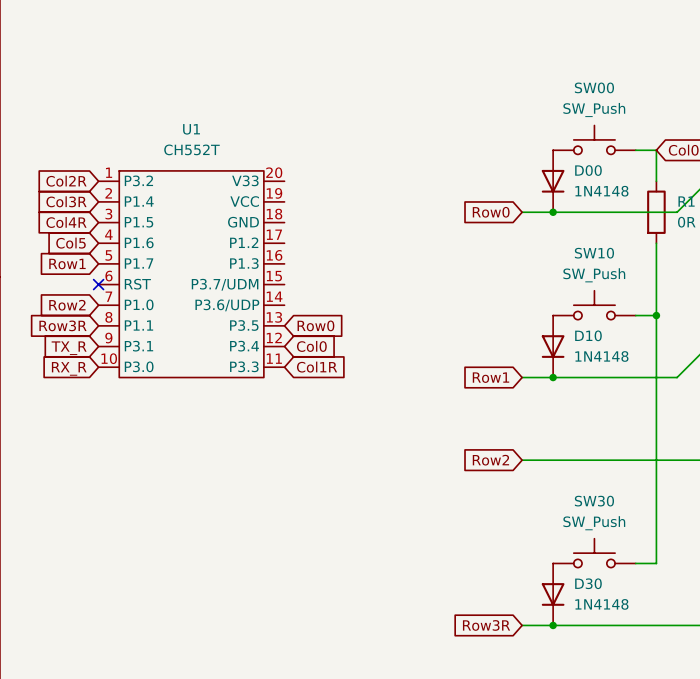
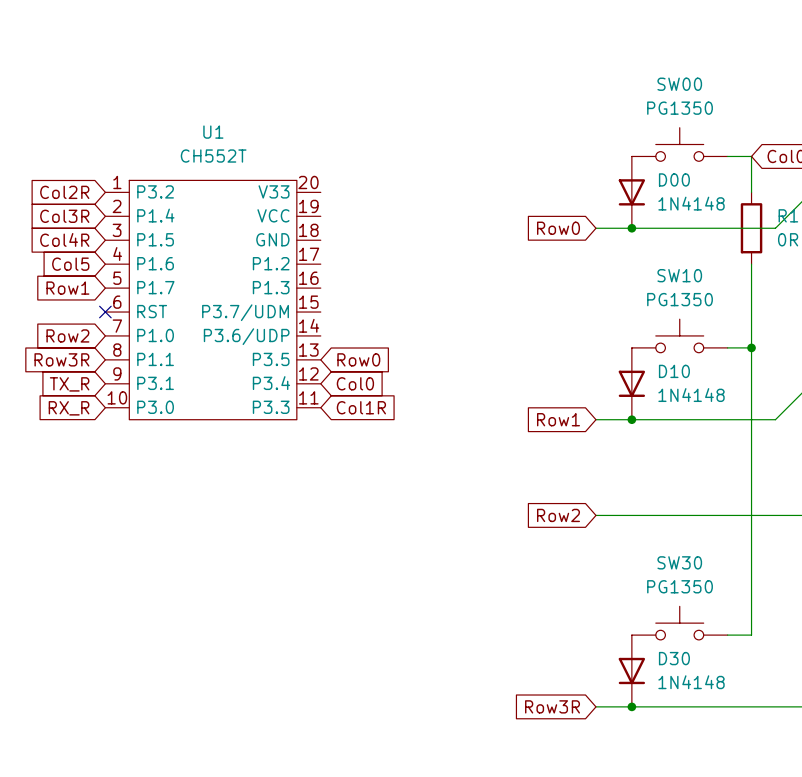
SW00 value: SW_Push (594, 110) -> PG1350 (680, 108)
SW10 value: SW_Push (594, 275) -> PG1350 (680, 299)
SW30 value: SW_Push (594, 523) -> PG1350 (680, 586)

